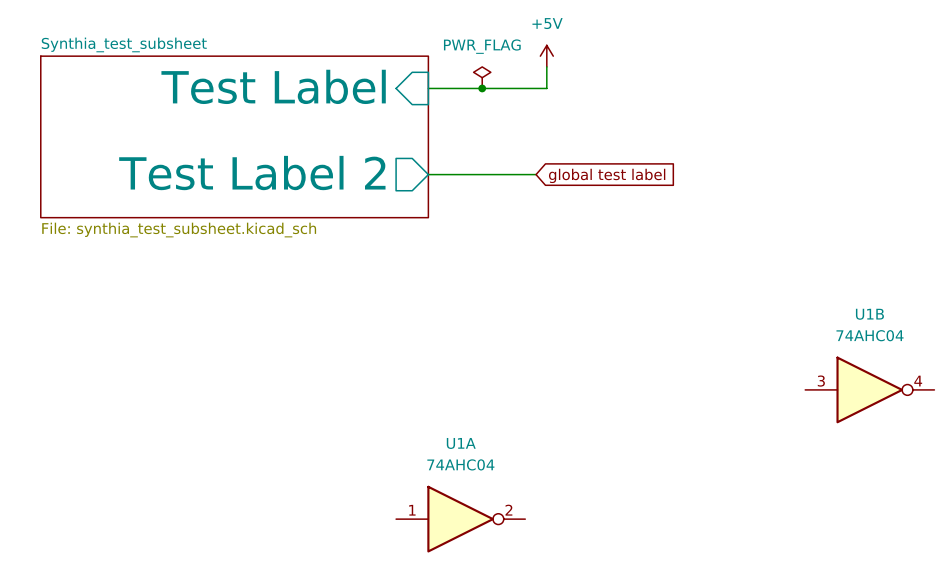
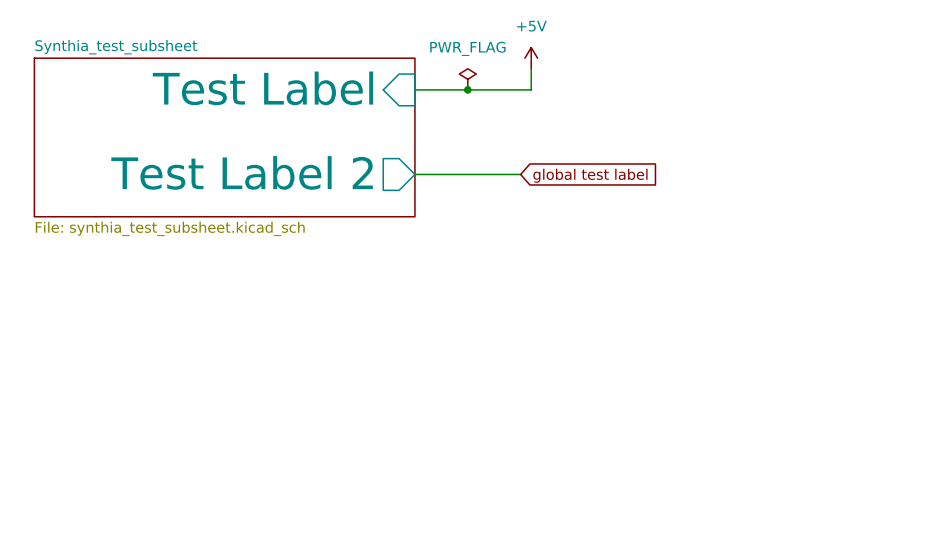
U1B: 74AHC04 (869, 389) -> none
U1A: 74AHC04 (460, 519) -> none

